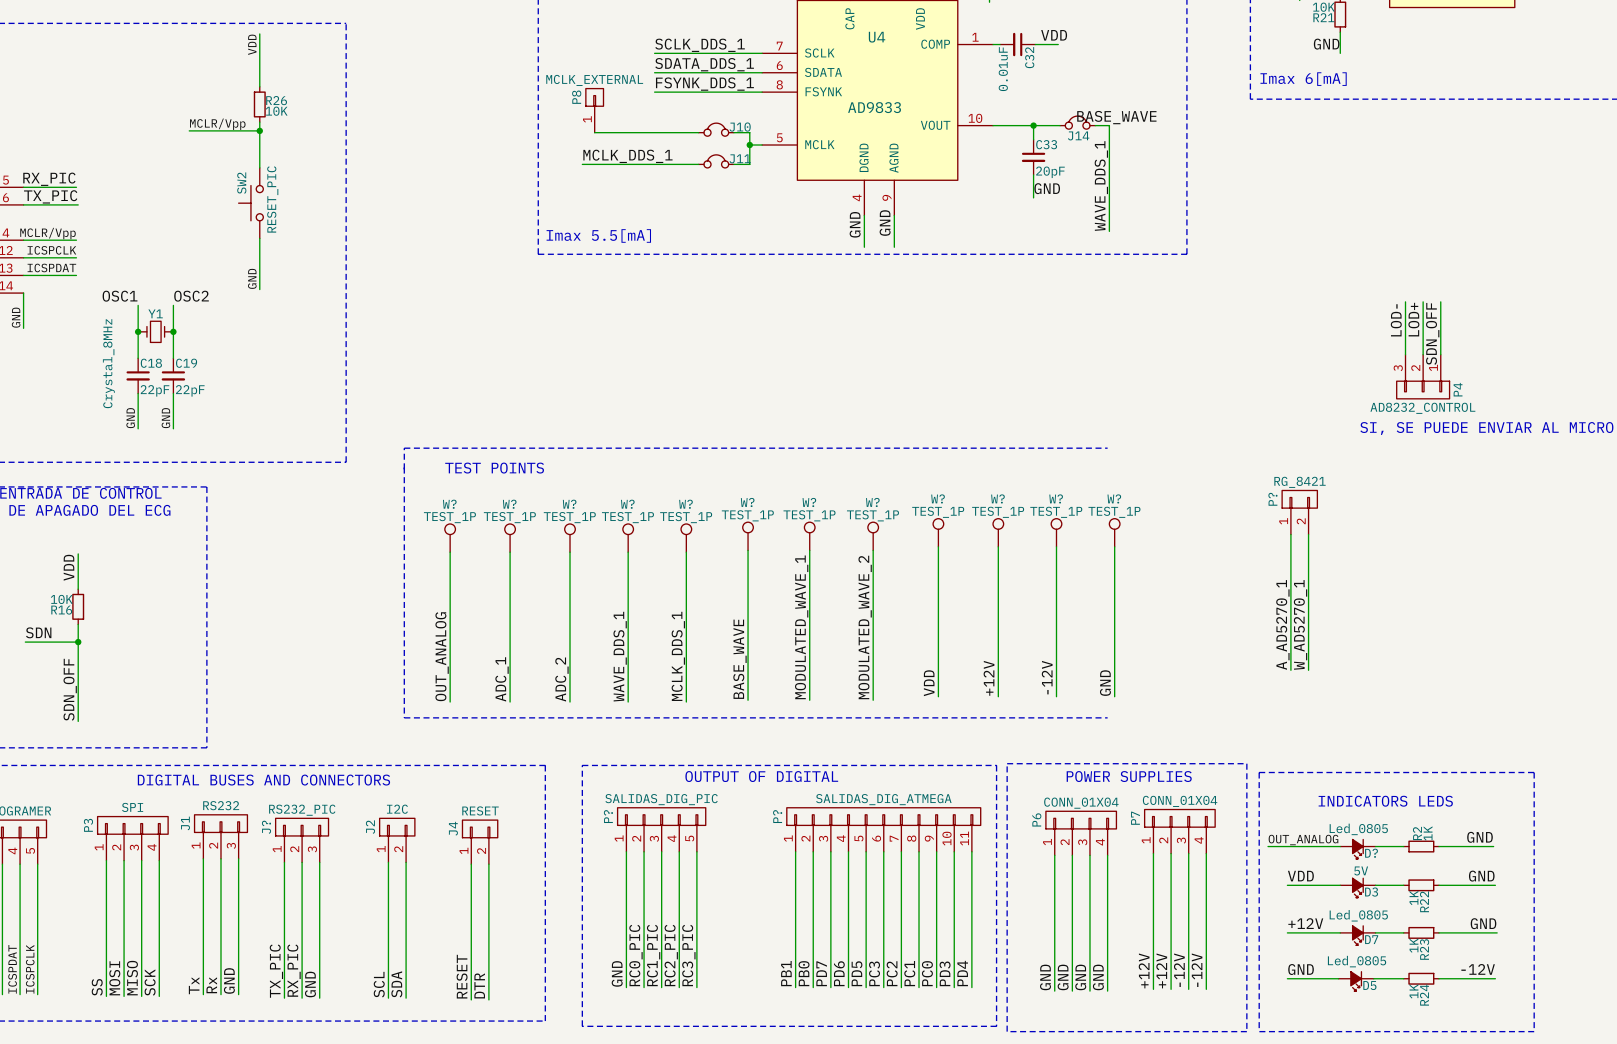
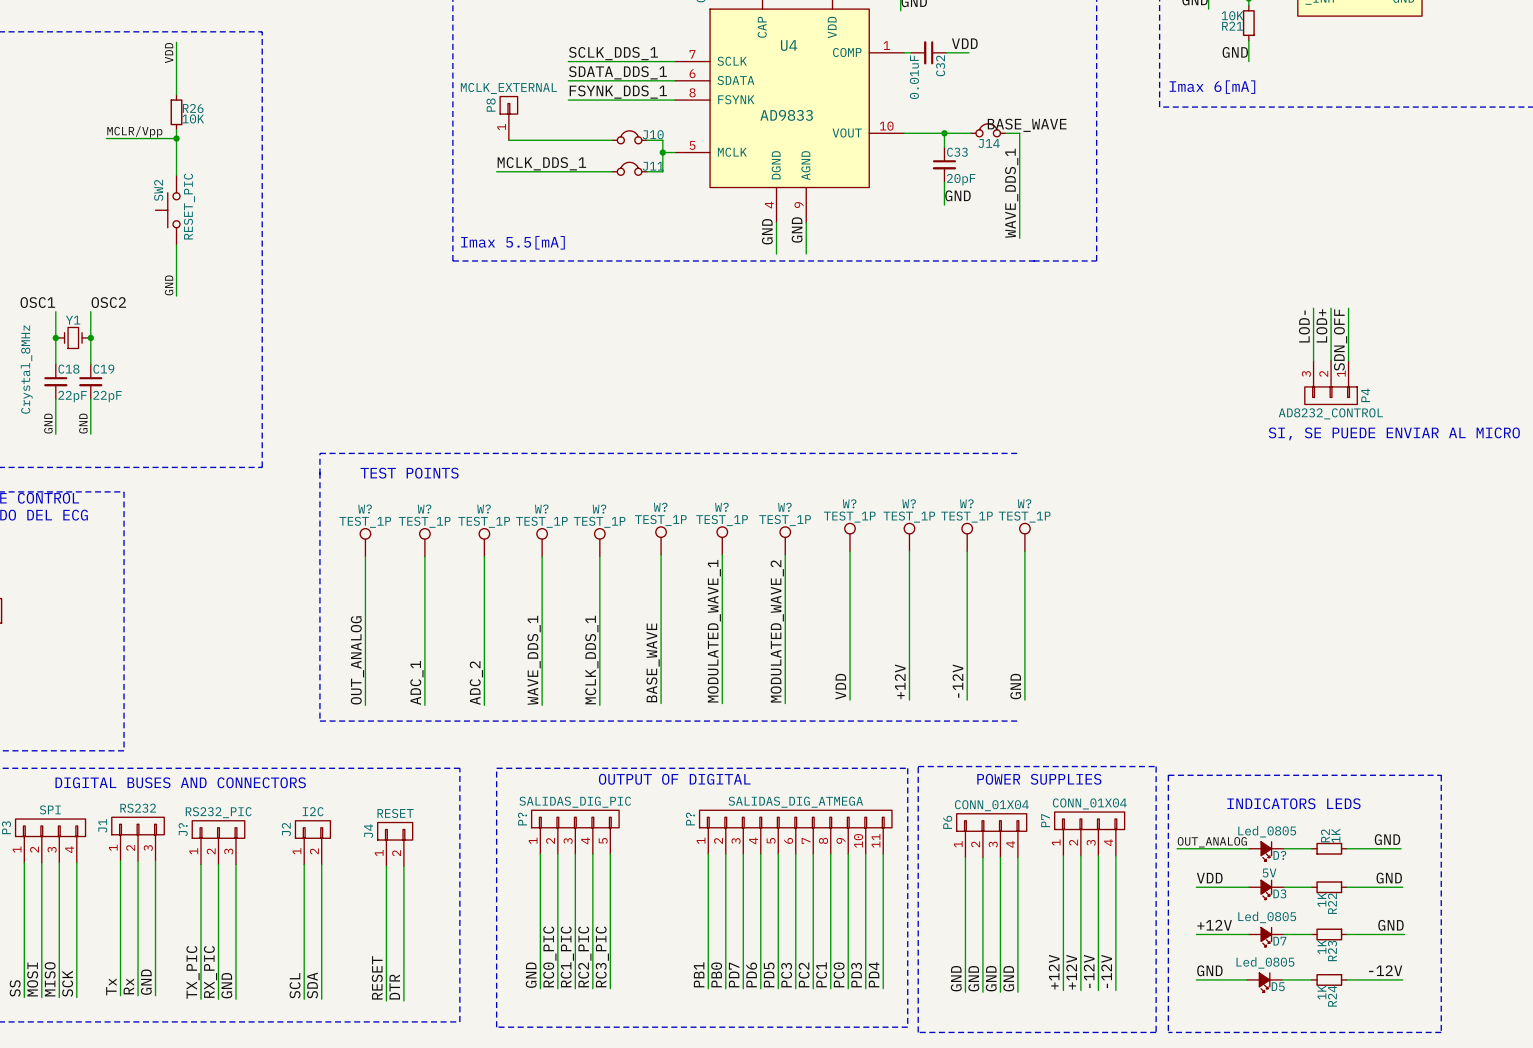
P?: RG_8421 (1299, 512) -> none
wire: (1290, 534) (1290, 670) -> none
wire: (1308, 534) (1308, 670) -> none
label: A_AD5270_1 (1282, 624) -> none
label: W_AD5270_1 (1300, 624) -> none

